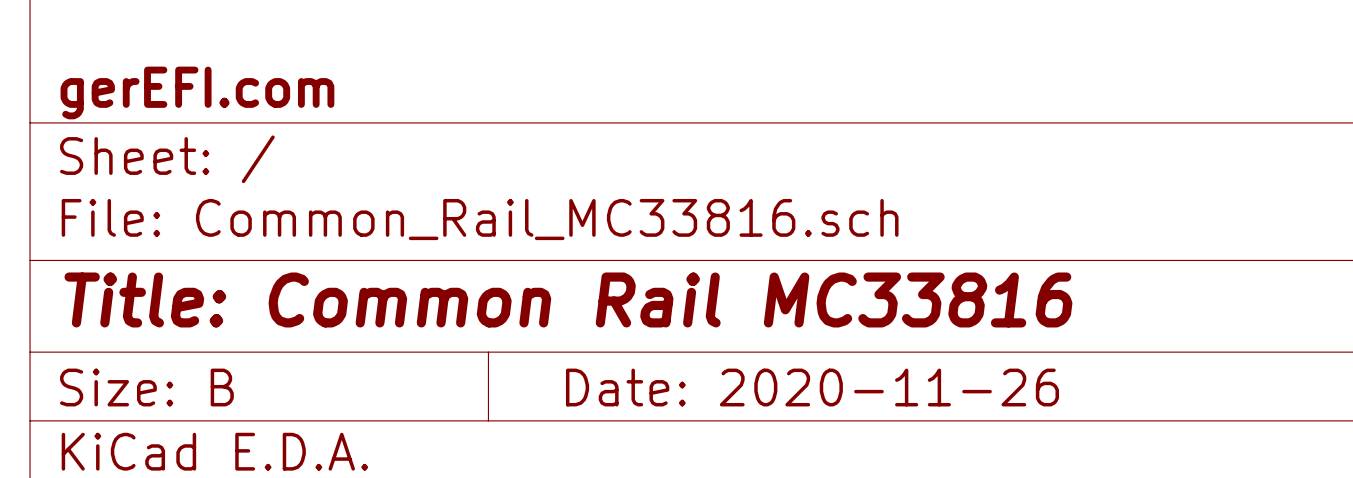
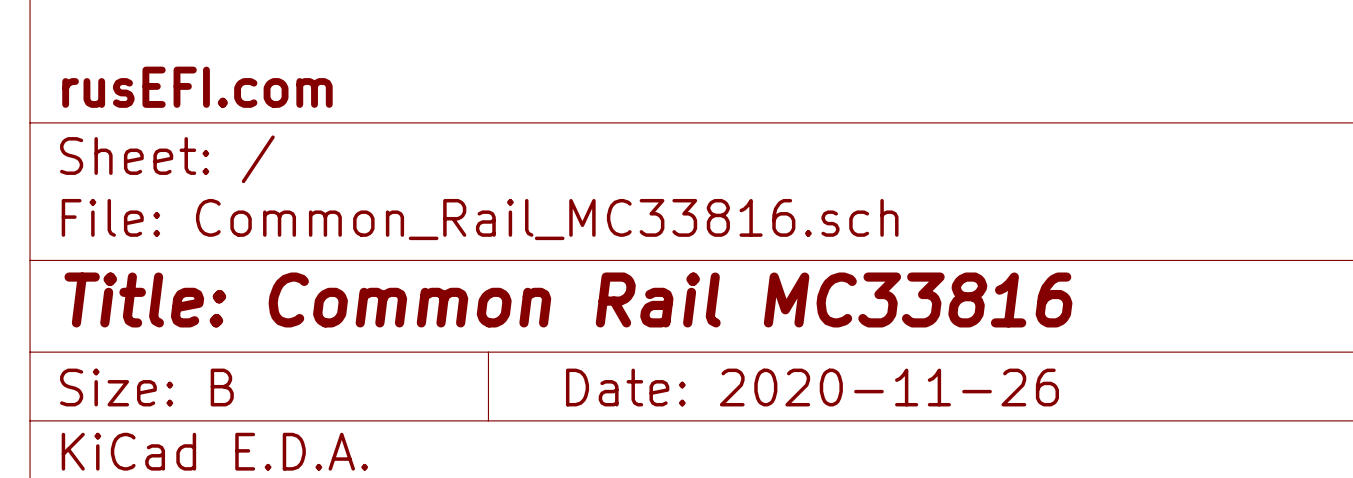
title block: gerEFI.com (197, 92) -> rusEFI.com (197, 87)

